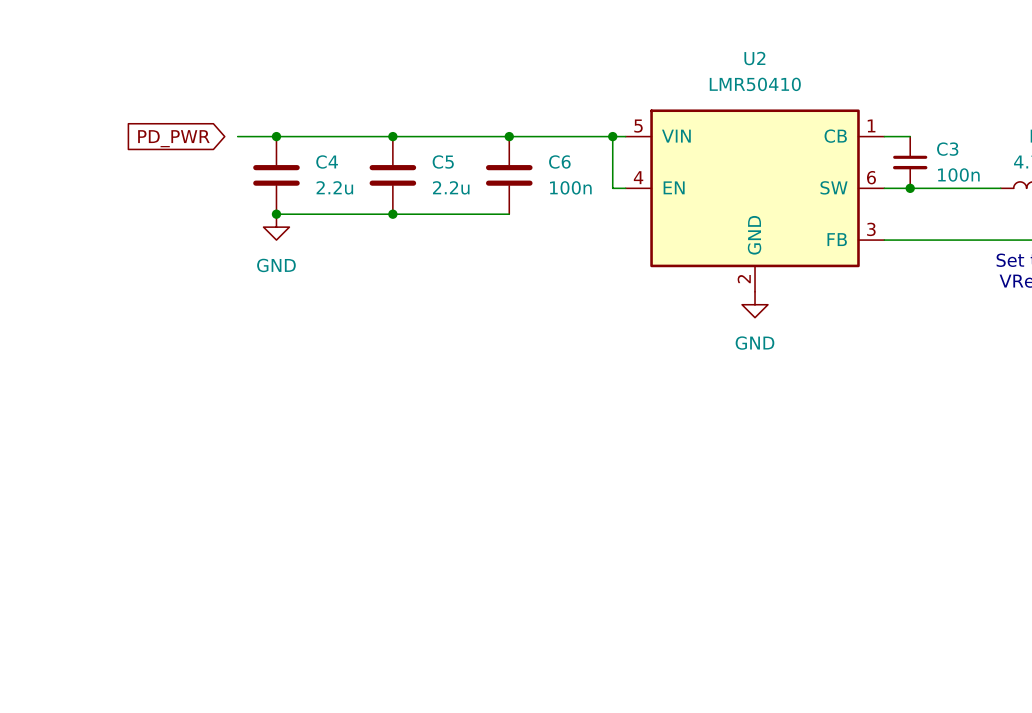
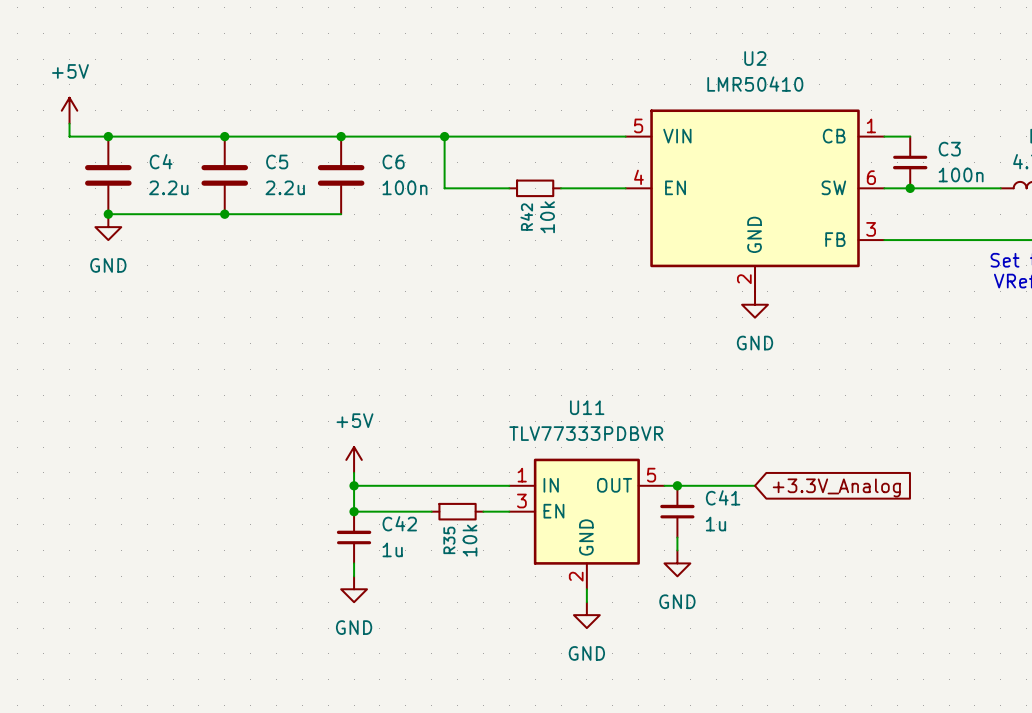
power symbol: none -> +5V (69, 110)
wire: none -> (69, 123) (69, 136) (237, 136)
junction: none -> (108, 136)
junction: none -> (224, 136)
junction: (276, 136) -> none
junction: none -> (341, 136)
junction: (392, 136) -> none
wire: none -> (444, 136) (444, 188) (509, 188)
junction: none -> (444, 136)
junction: (509, 136) -> none
wire: (612, 136) (612, 188) -> (561, 188) (612, 188)
junction: (612, 136) -> none
global label: PD_PWR (173, 138) -> none
C4 position: (276, 175) -> (108, 175)
C5 position: (392, 175) -> (224, 175)
C6 position: (509, 175) -> (341, 175)
R42: none -> 10k (535, 188)
junction: none -> (108, 214)
junction: none -> (224, 214)
junction: (276, 214) -> none
wire: (341, 214) (509, 214) -> (108, 214) (276, 214)
junction: (392, 214) -> none
power symbol position: GND (276, 227) -> GND (108, 227)
power symbol: none -> +5V (354, 459)
wire: none -> (354, 472) (354, 511) (431, 511)
wire: none -> (354, 485) (509, 485)
junction: none -> (354, 485)
wire: none -> (664, 485) (755, 485)
junction: none -> (677, 485)
global label: none -> +3.3V_Analog (836, 487)
junction: none -> (354, 511)
R35: none -> 10k (457, 511)
wire: none -> (483, 511) (509, 511)
C41: none -> 1u (677, 511)
U11: none -> TLV77333PDBVR (586, 523)
C42: none -> 1u (354, 537)
wire: none -> (677, 537) (677, 550)
wire: none -> (354, 563) (354, 576)
power symbol: none -> GND (677, 563)
power symbol: none -> GND (354, 589)
wire: none -> (586, 589) (586, 602)
power symbol: none -> GND (586, 615)

